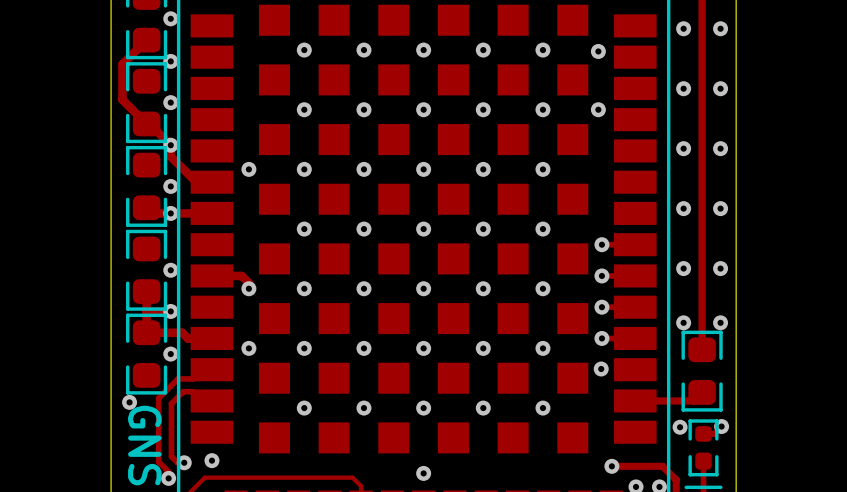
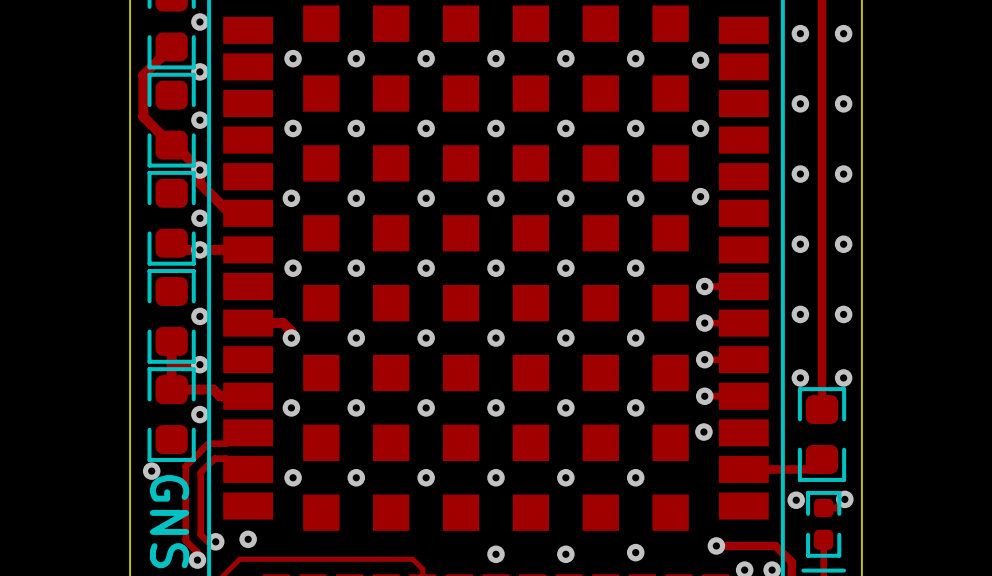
via: none -> (293, 58)
via: none -> (293, 128)
via: none -> (700, 196)
via: none -> (293, 268)
via: none -> (293, 477)
via: none -> (635, 552)
via: none -> (565, 554)

